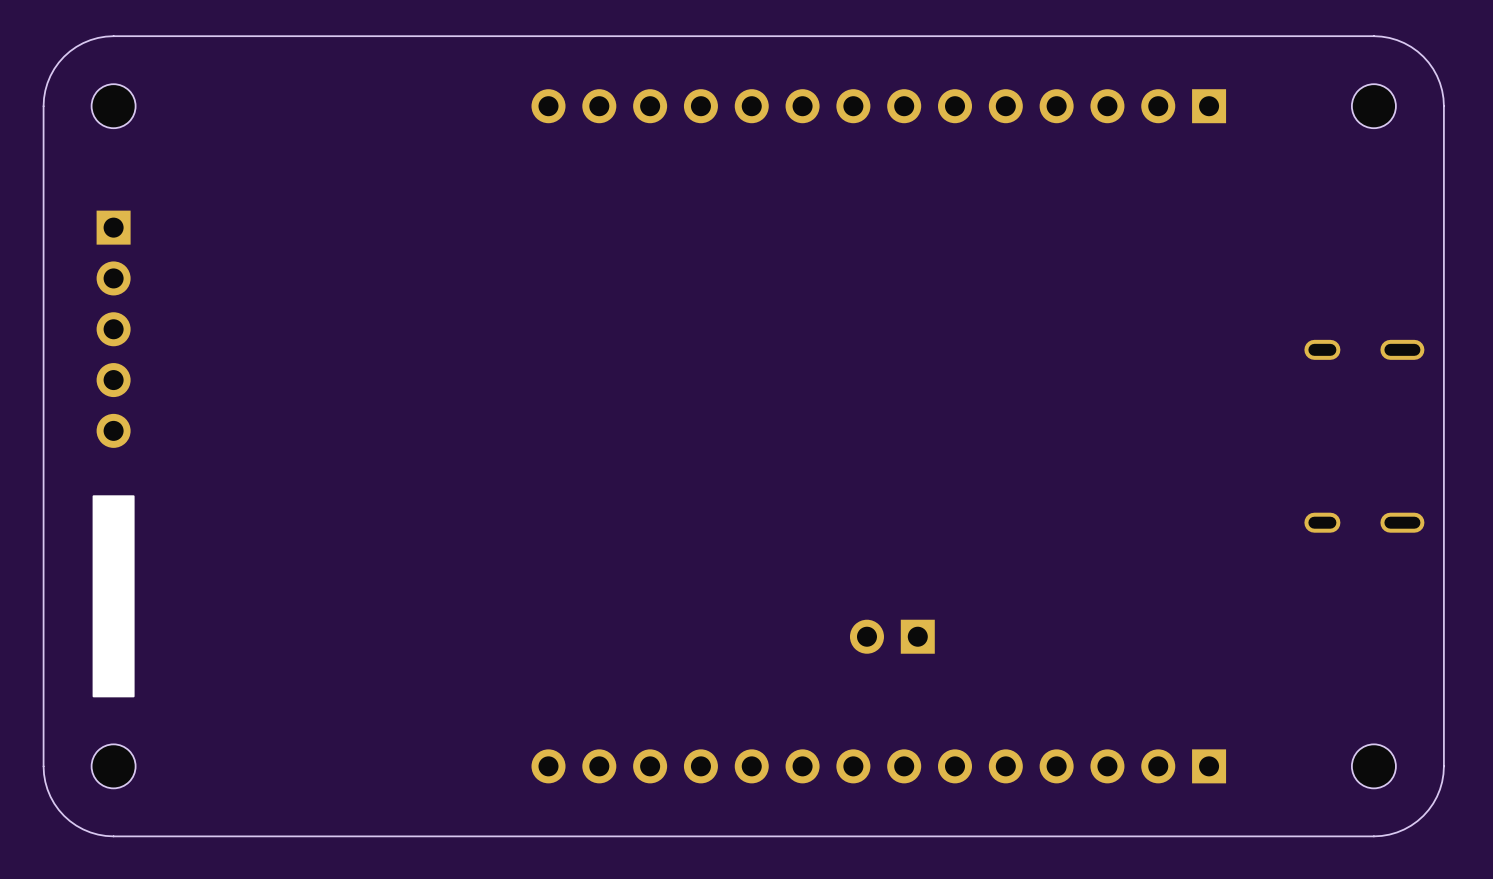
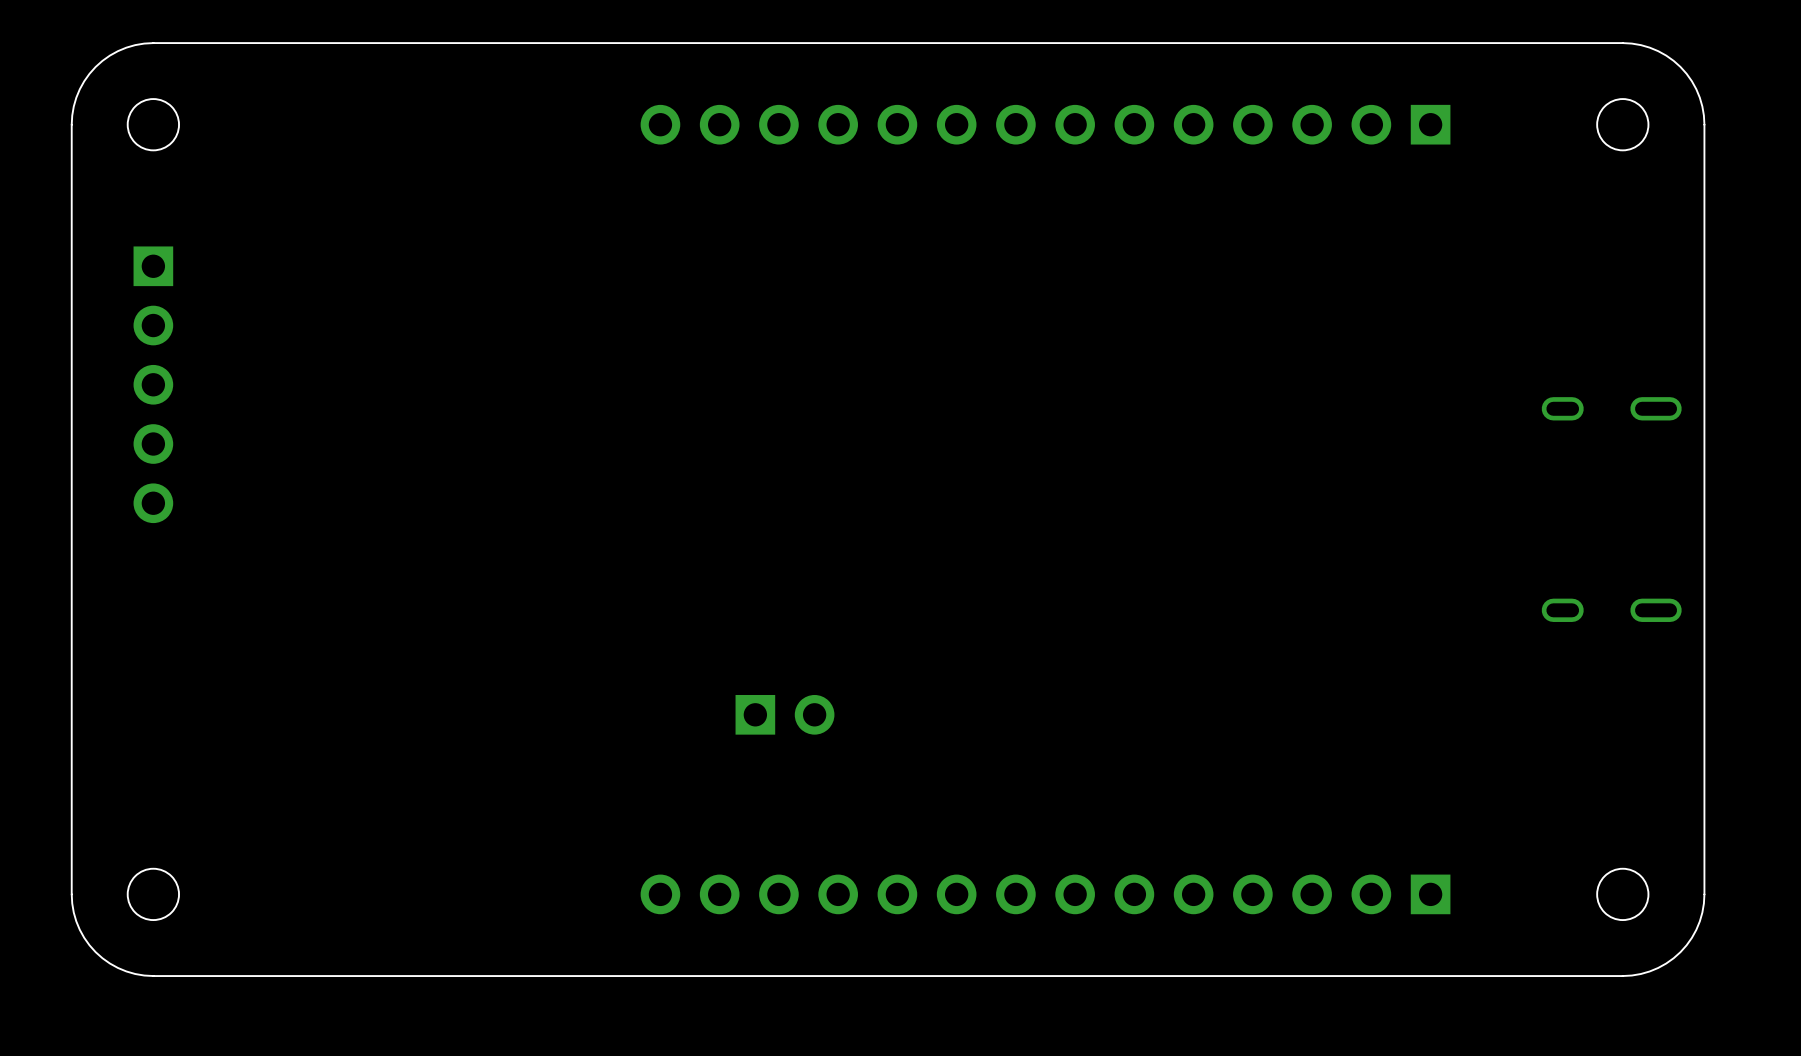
drawing: [92, 495, 135, 698] -> none
part rotation: 0° (892, 636) -> 180° (784, 714)
part position: (892, 636) -> (784, 714)

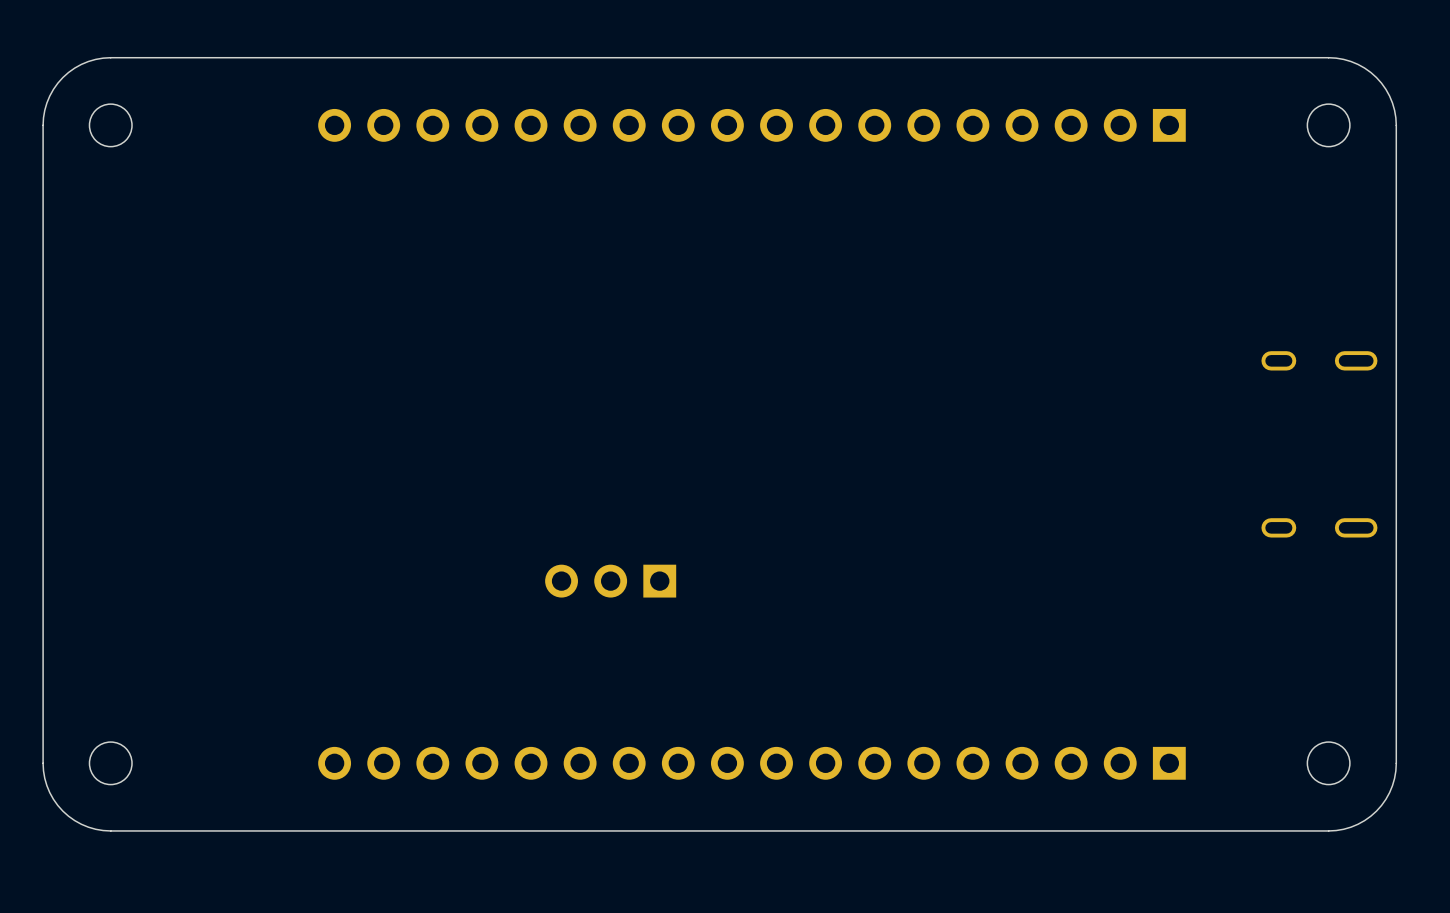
part: none -> (751, 125)
part: (153, 384) -> none
part: none -> (610, 581)
part: (784, 714) -> none
part: none -> (751, 763)

